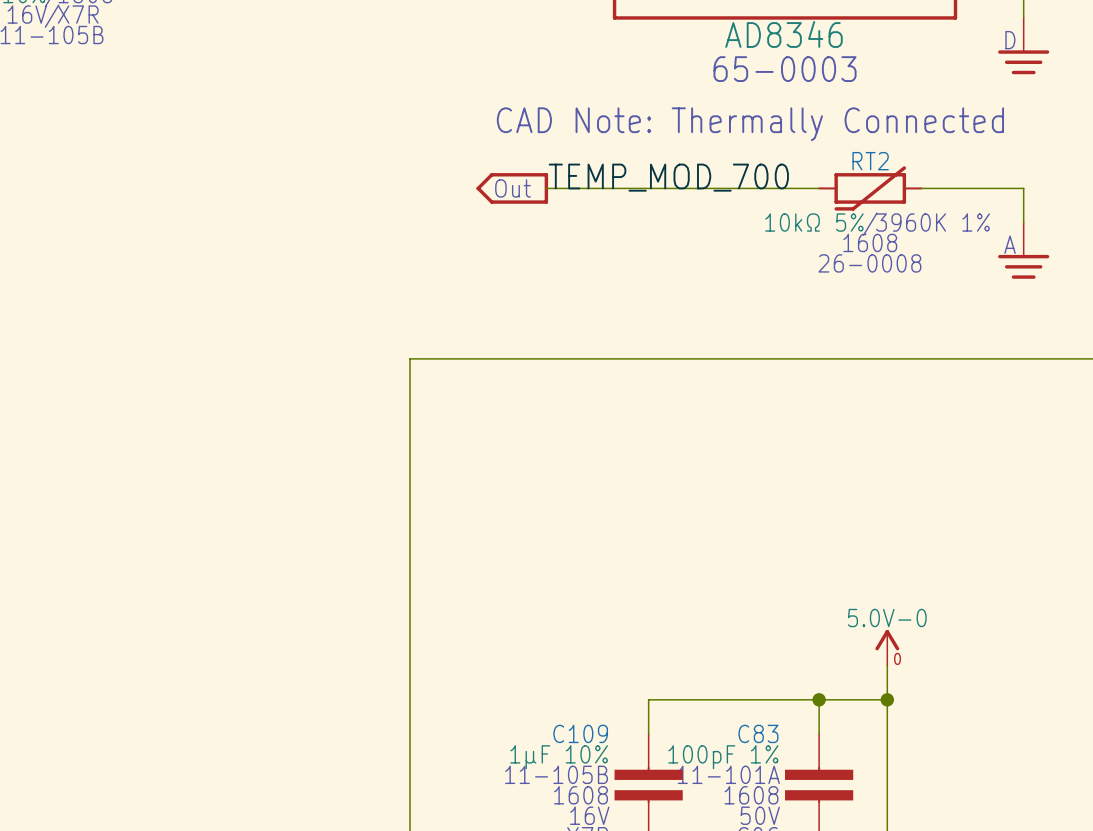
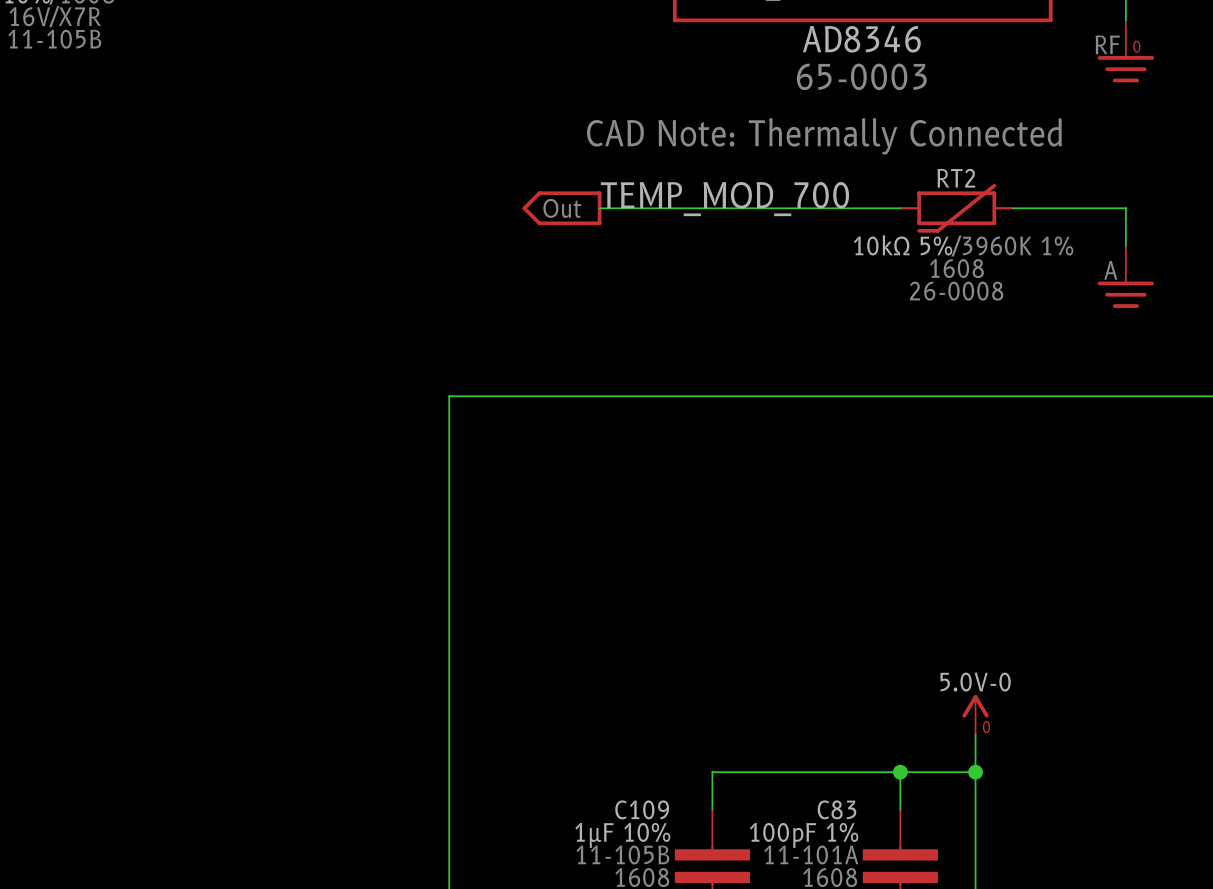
power symbol text: none -> RF (1107, 44)
power symbol text: D (1010, 40) -> none
power symbol text: none -> 0 (1136, 46)

